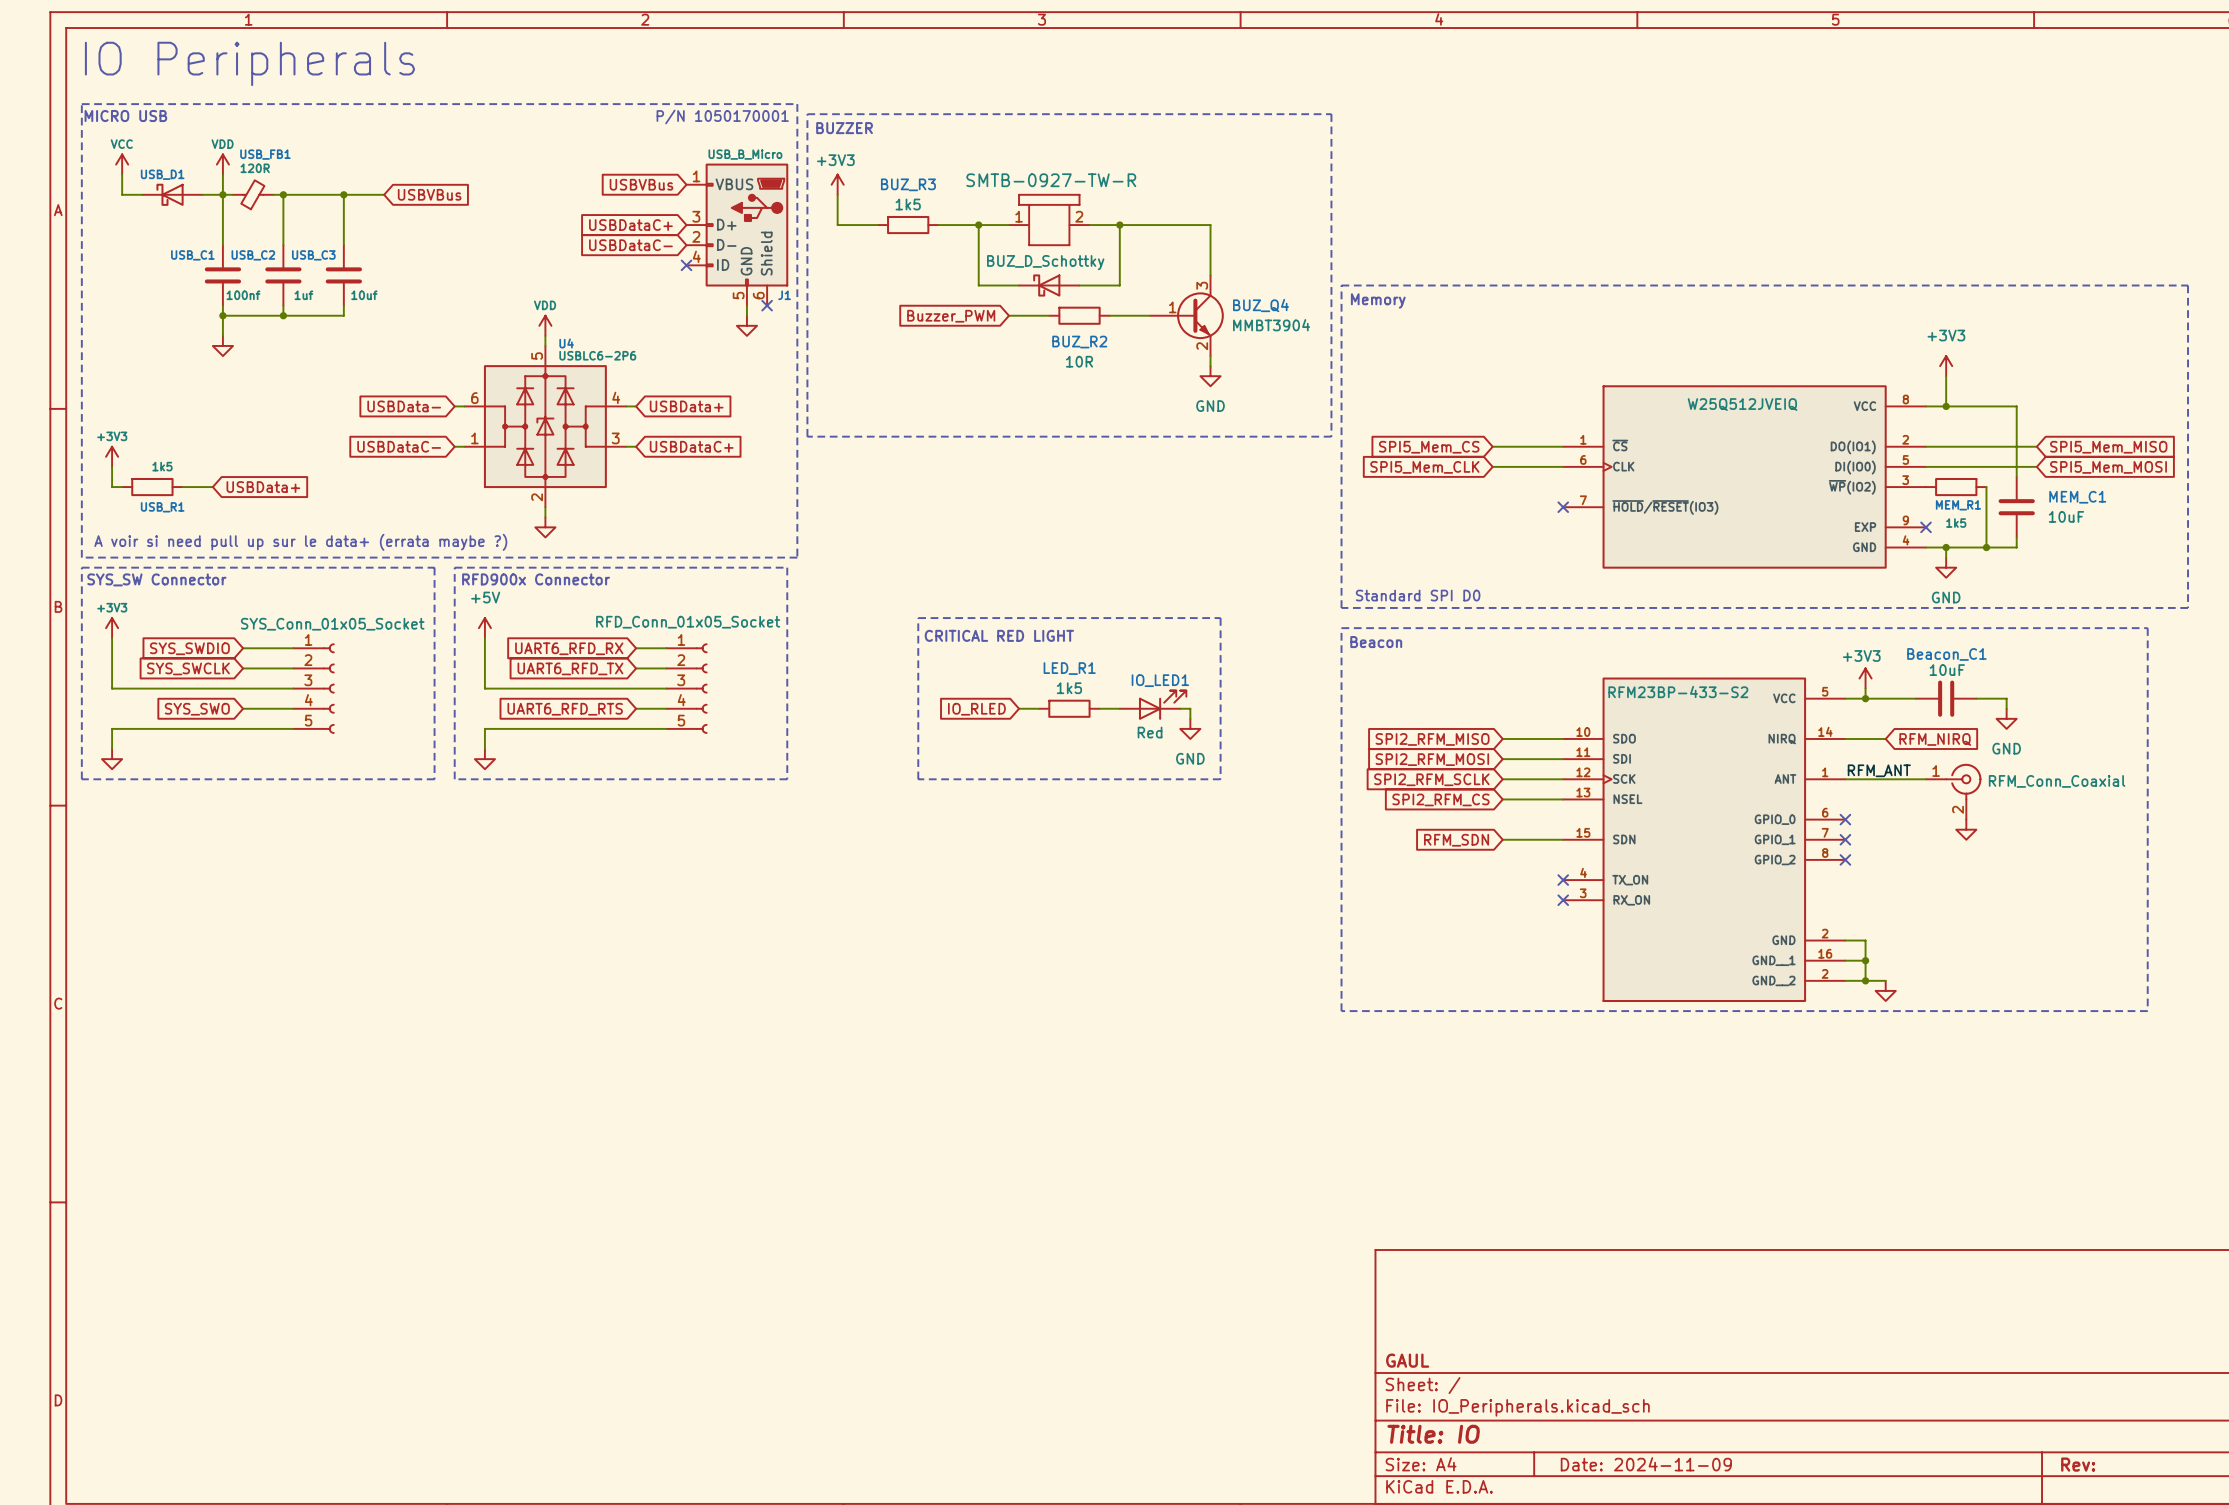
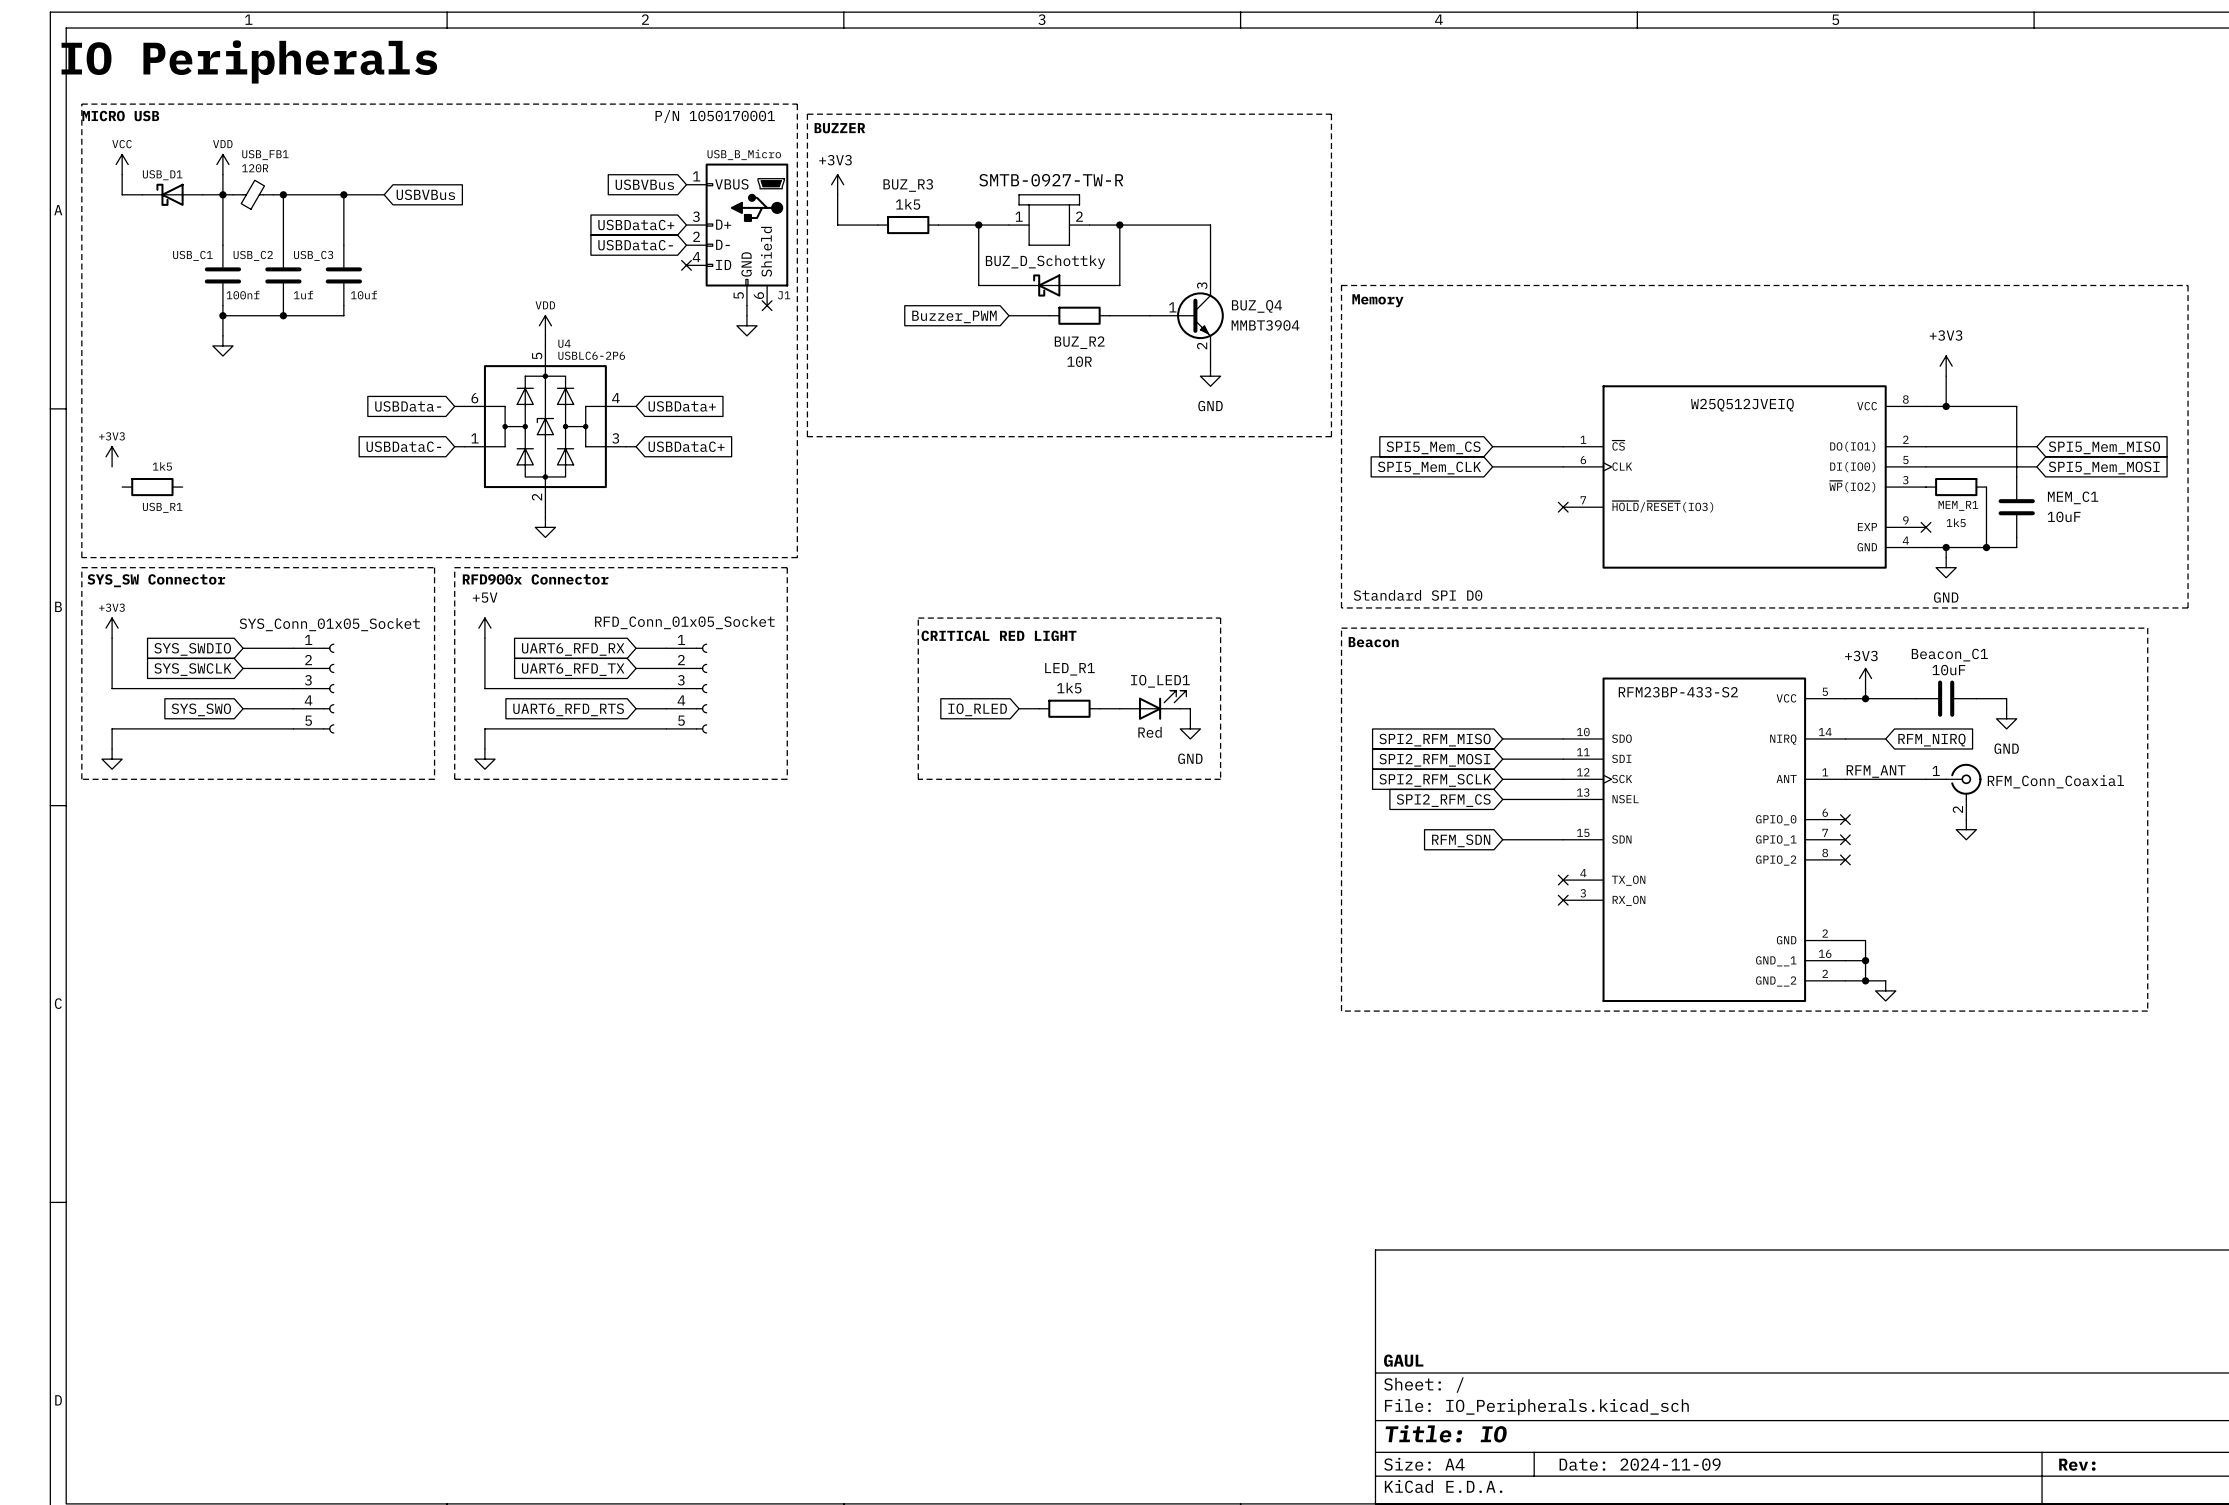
wire: (112, 466) (112, 487) (122, 487) -> none
wire: (182, 487) (212, 487) -> none
global label: USBData+ (263, 487) -> none
text: A voir si need pull up sur le data+ (errata maybe ?) (300, 542) -> none

